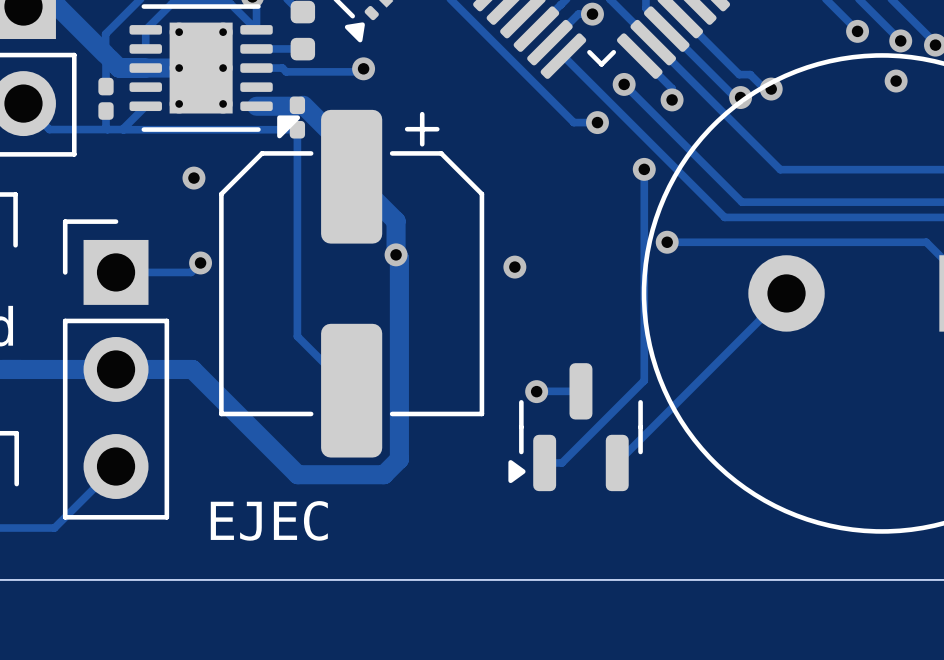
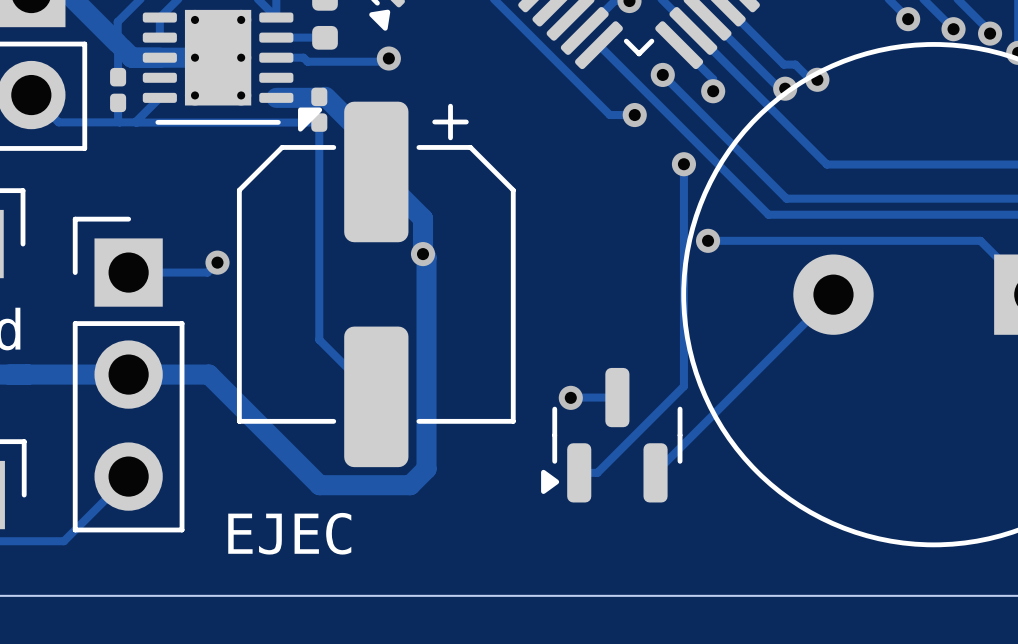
via: (896, 81) -> none
via: (193, 178) -> none
via: (514, 267) -> none

